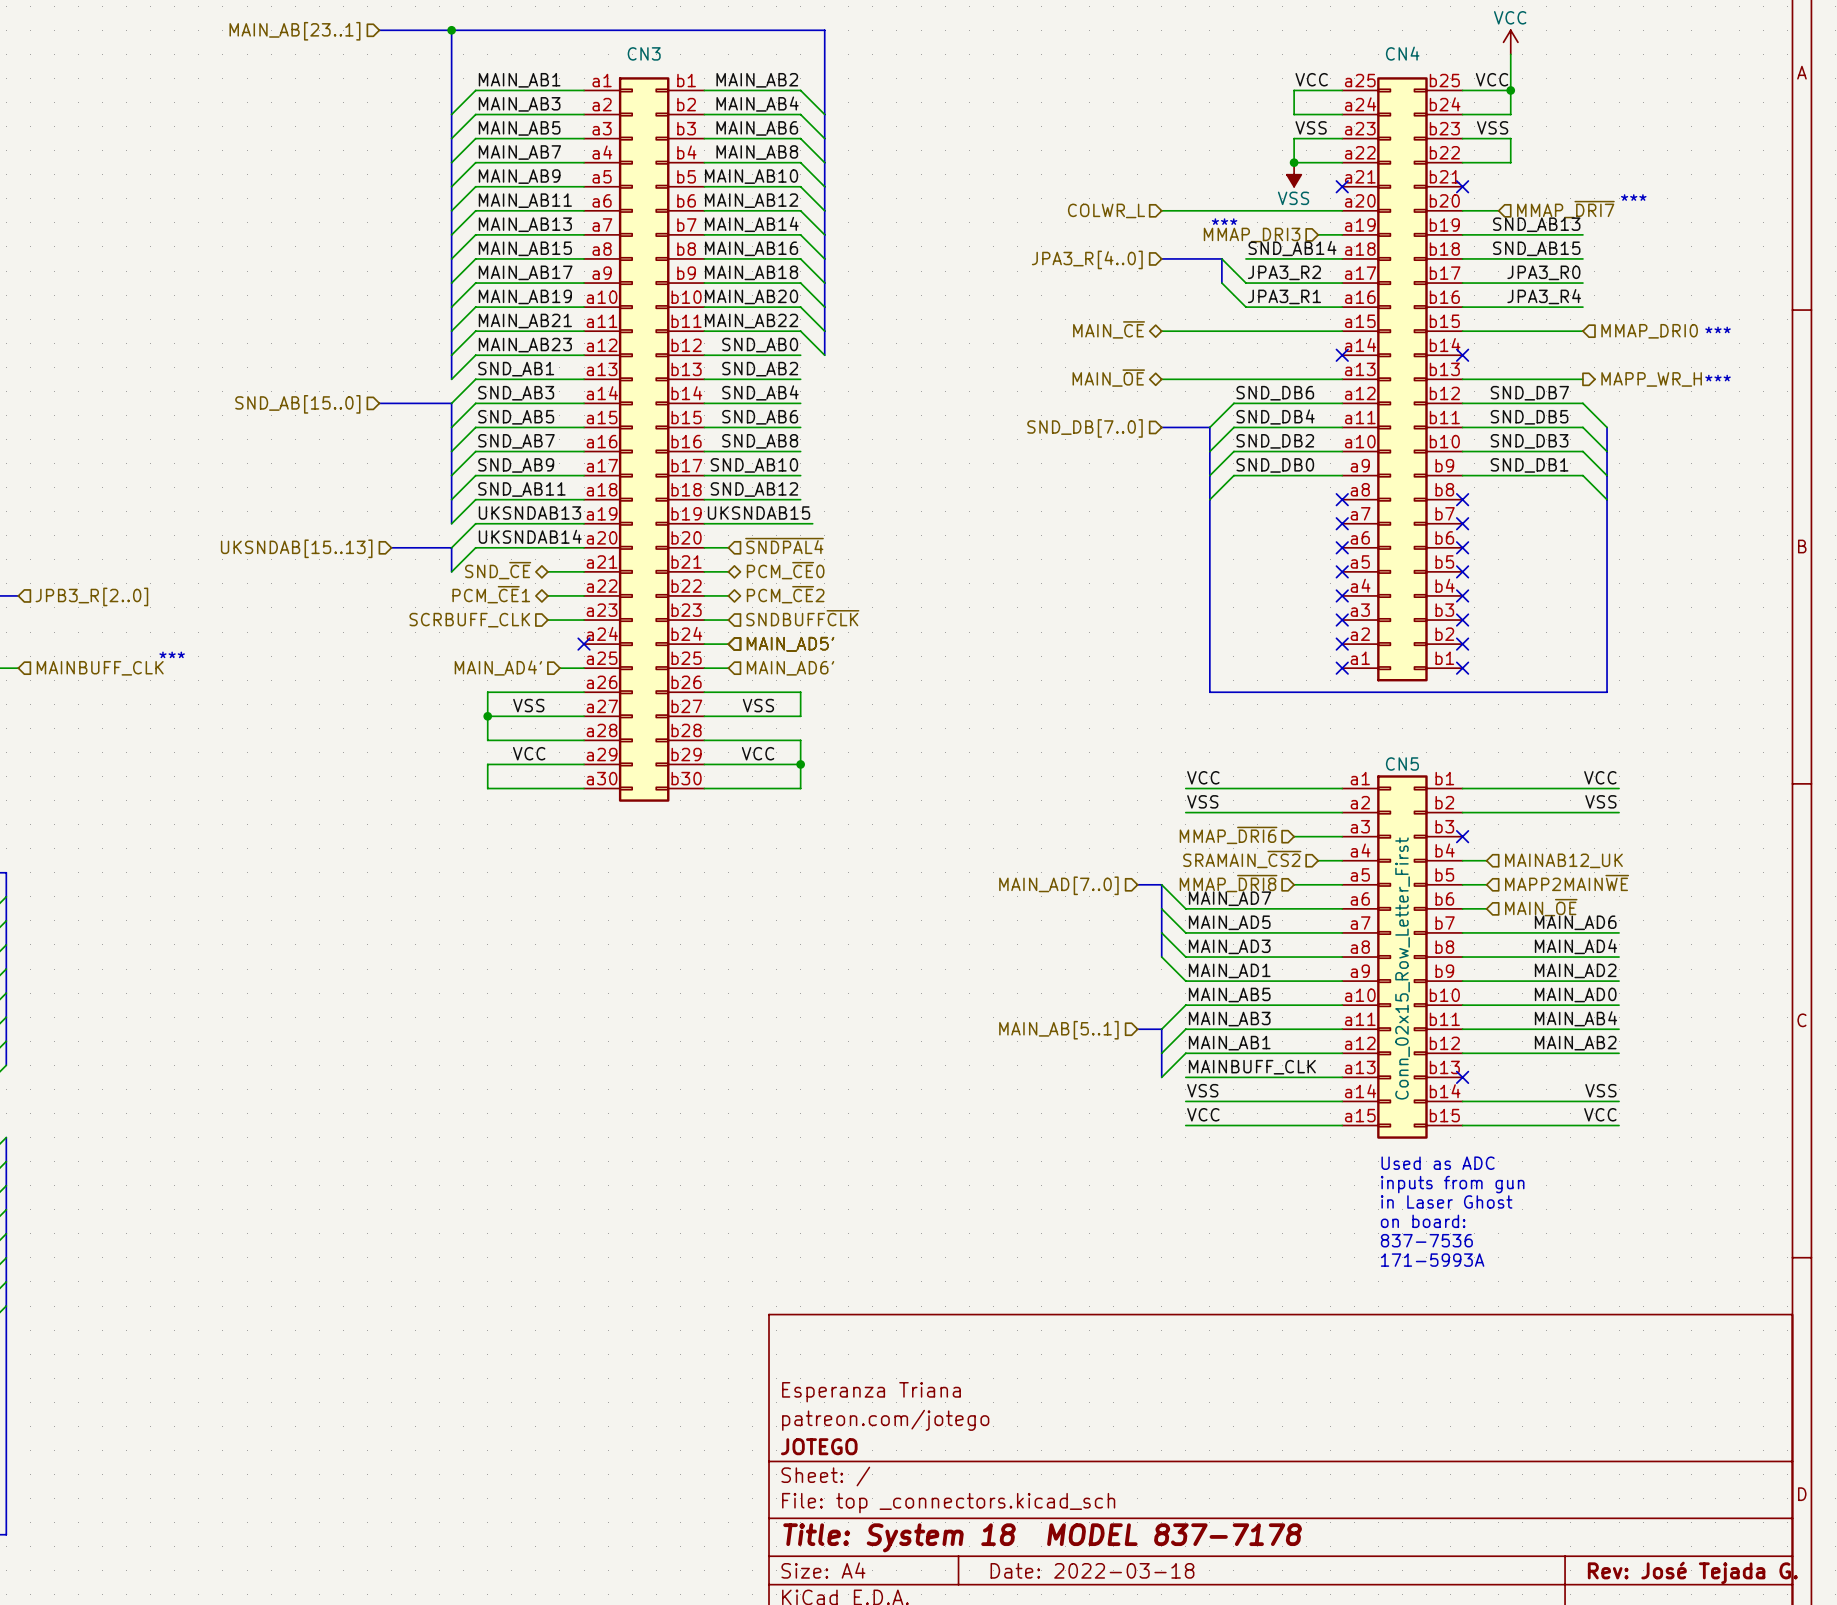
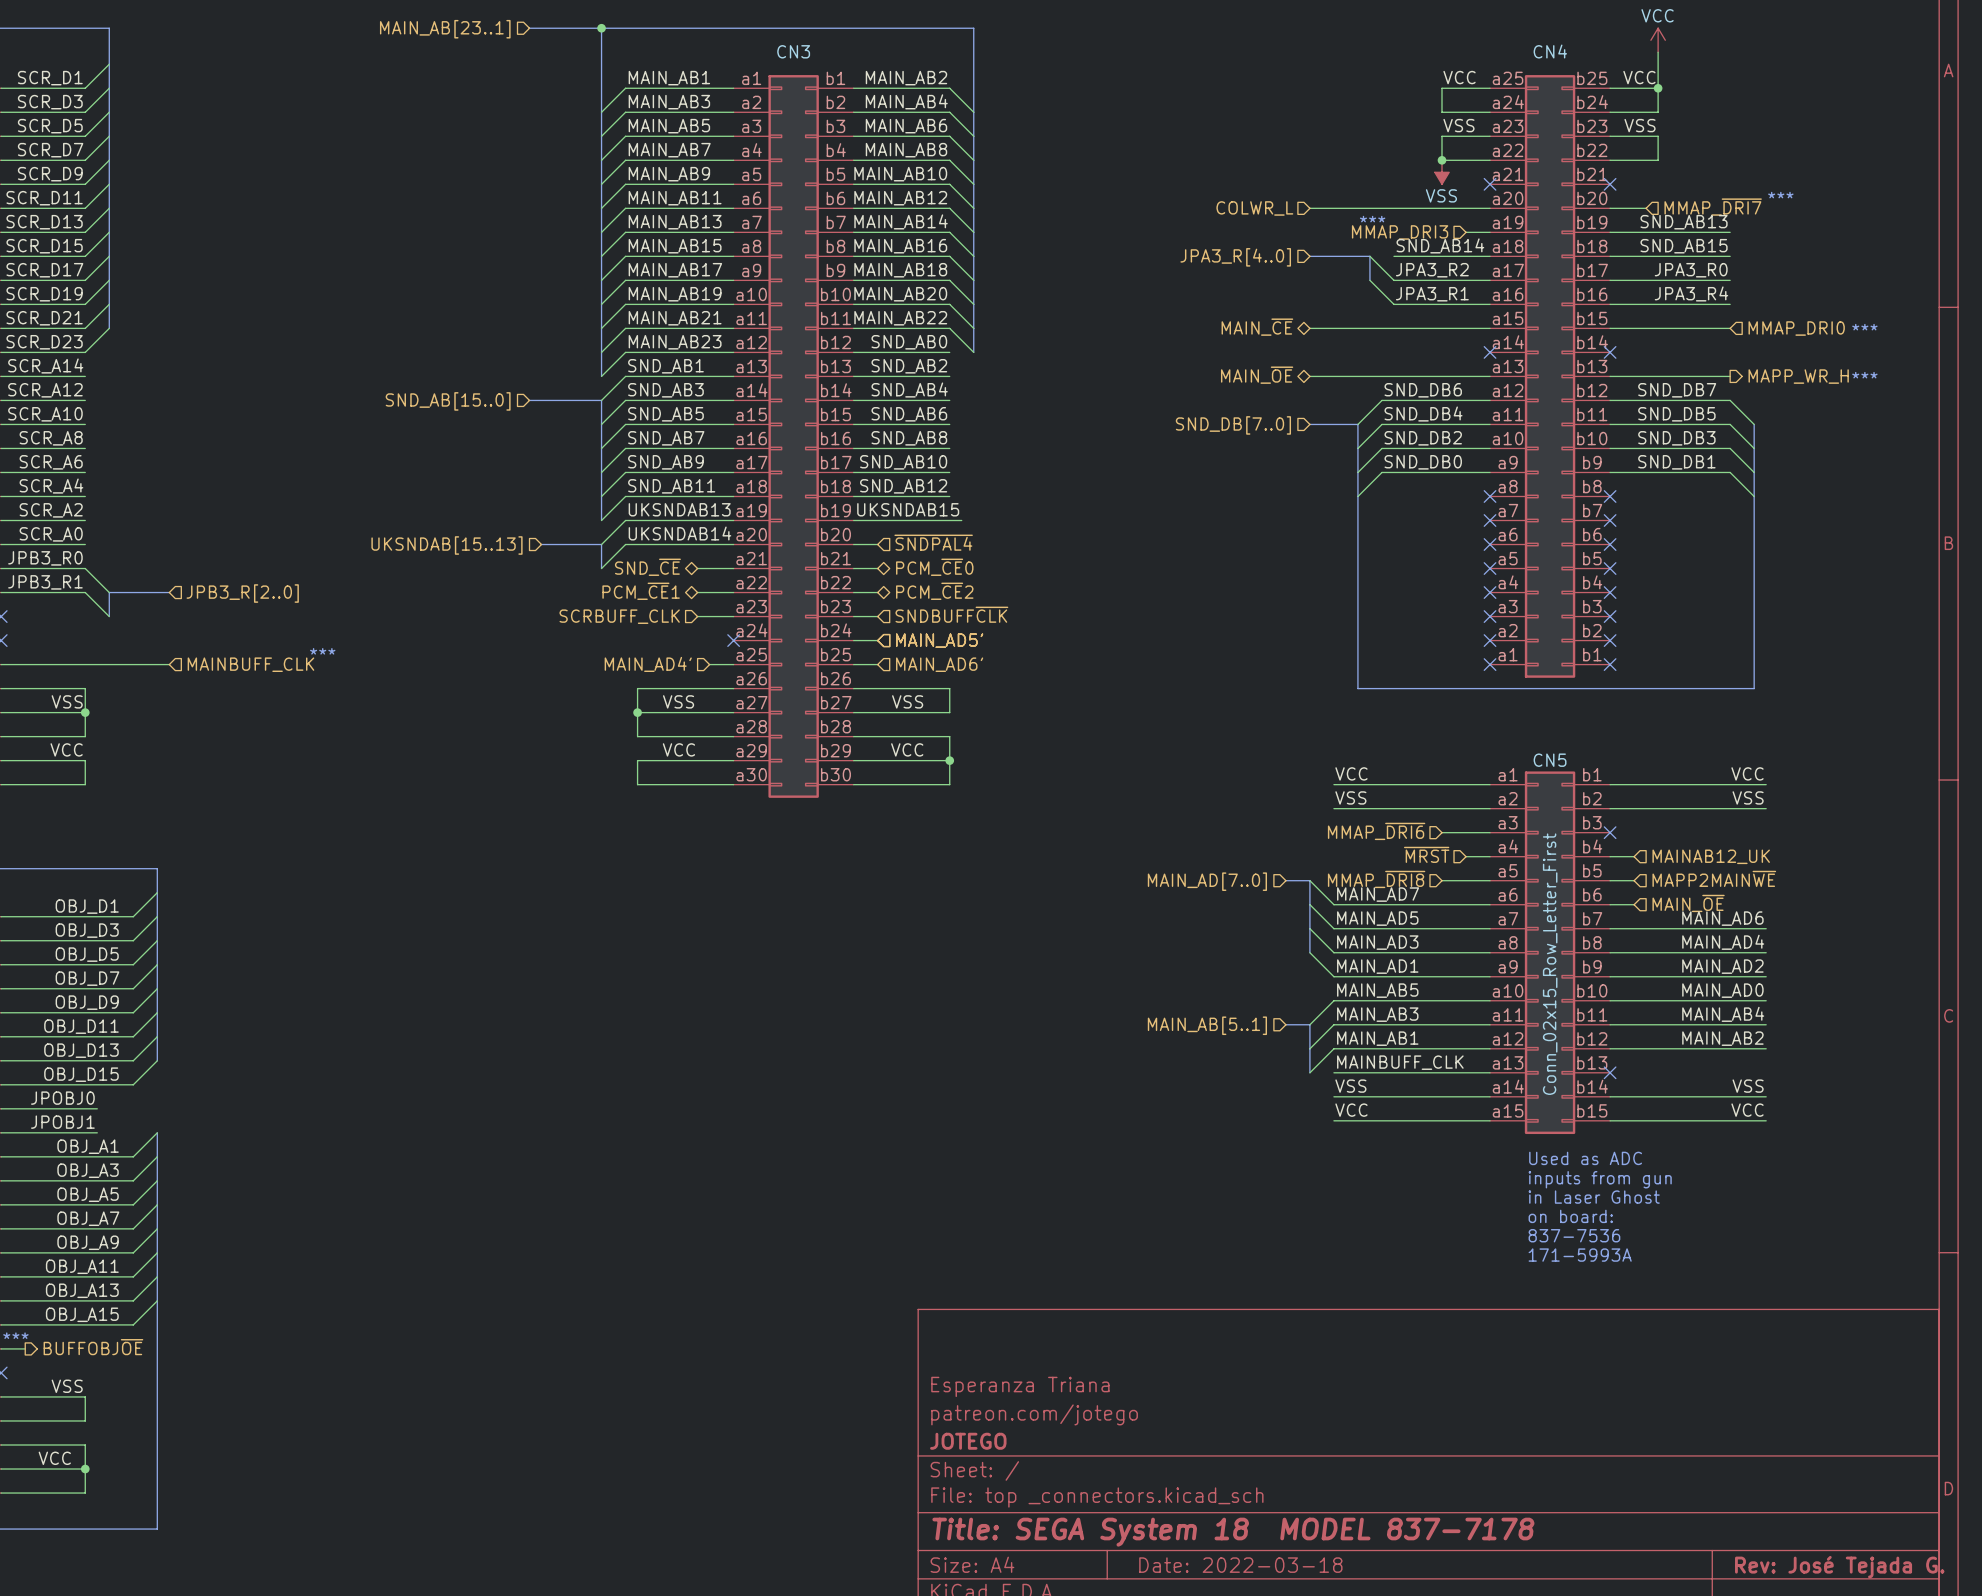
hierarchical label: SRAMAIN_~{CS2} (1242, 859) -> ~{MRST} (1426, 854)
title block: Title: System 18 MODEL 837-7178 (1042, 1537) -> Title: SEGA System 18 MODEL 837-7178 (1233, 1532)

